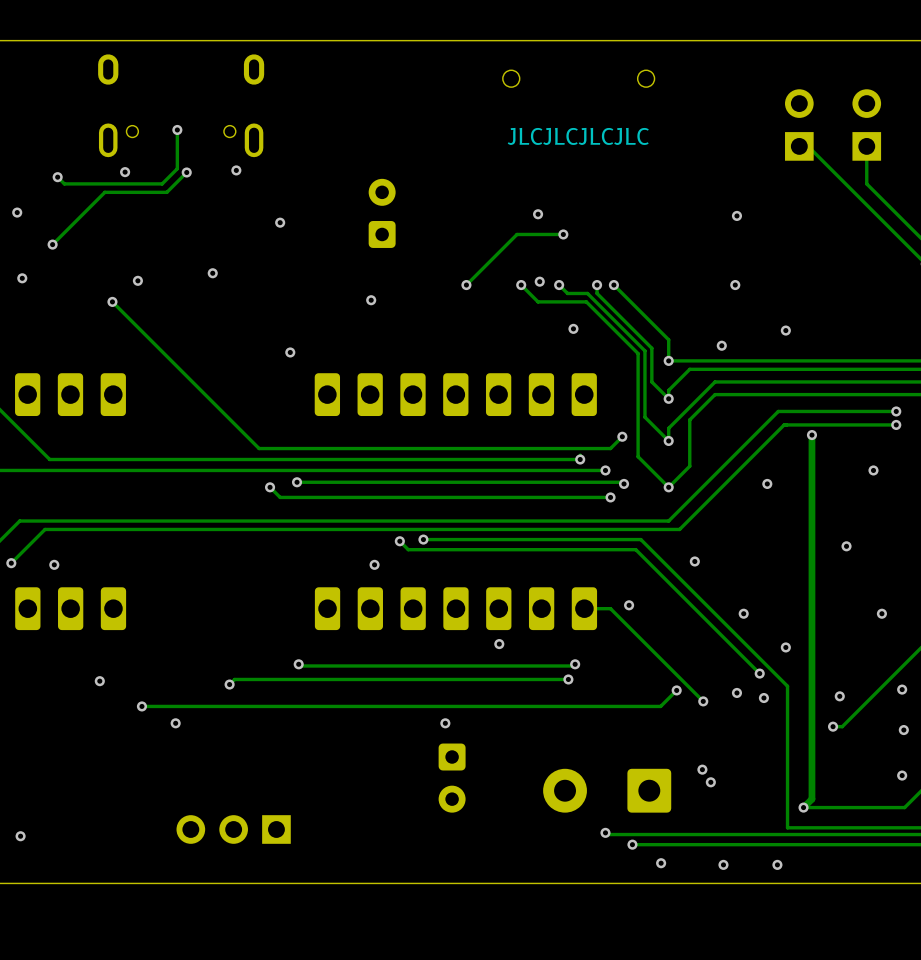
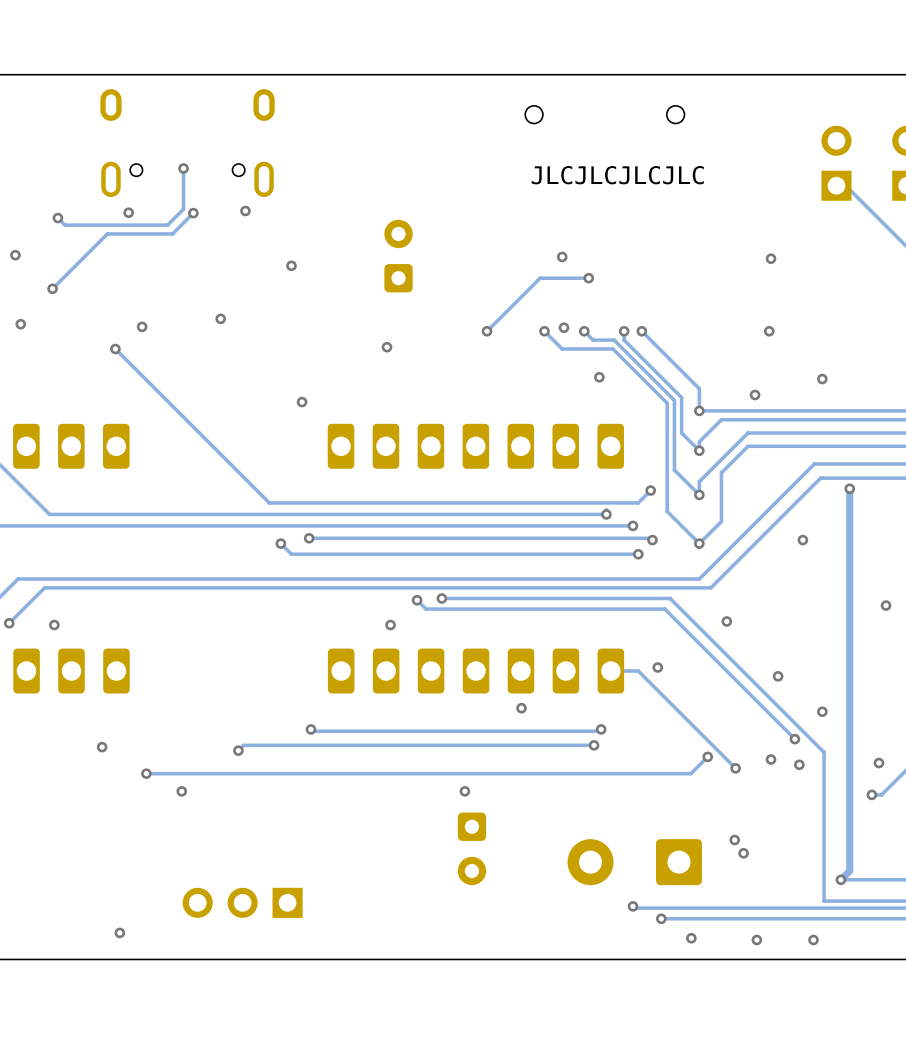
via position: (20, 836) -> (119, 932)

